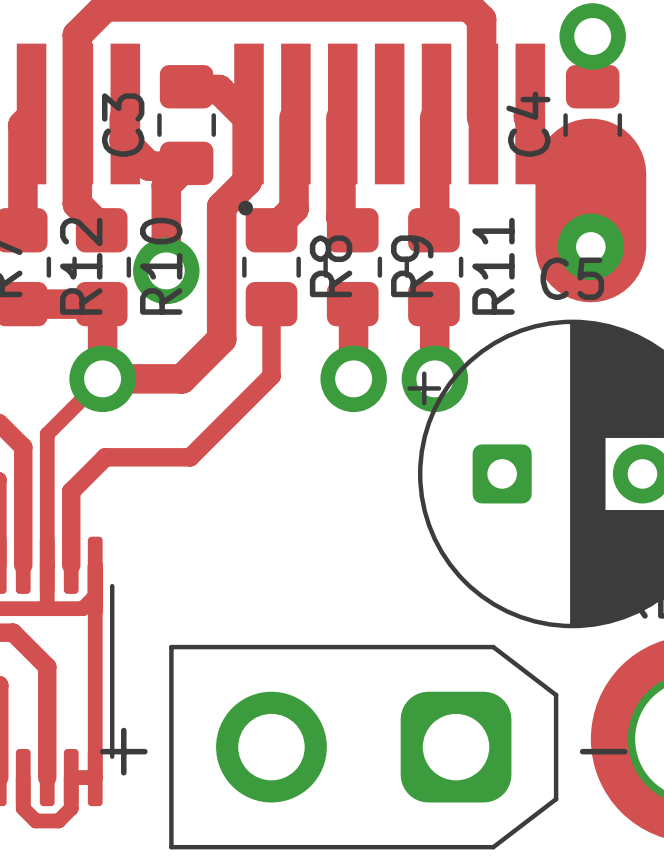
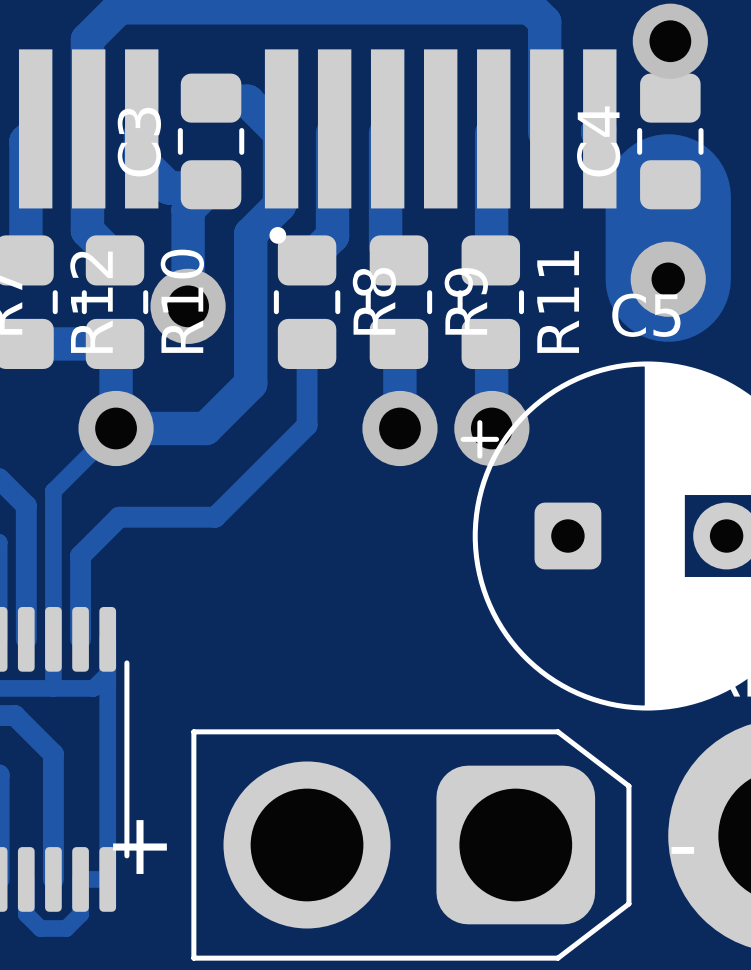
part footprint: [169, 644, 559, 850] -> [191, 729, 632, 961]

